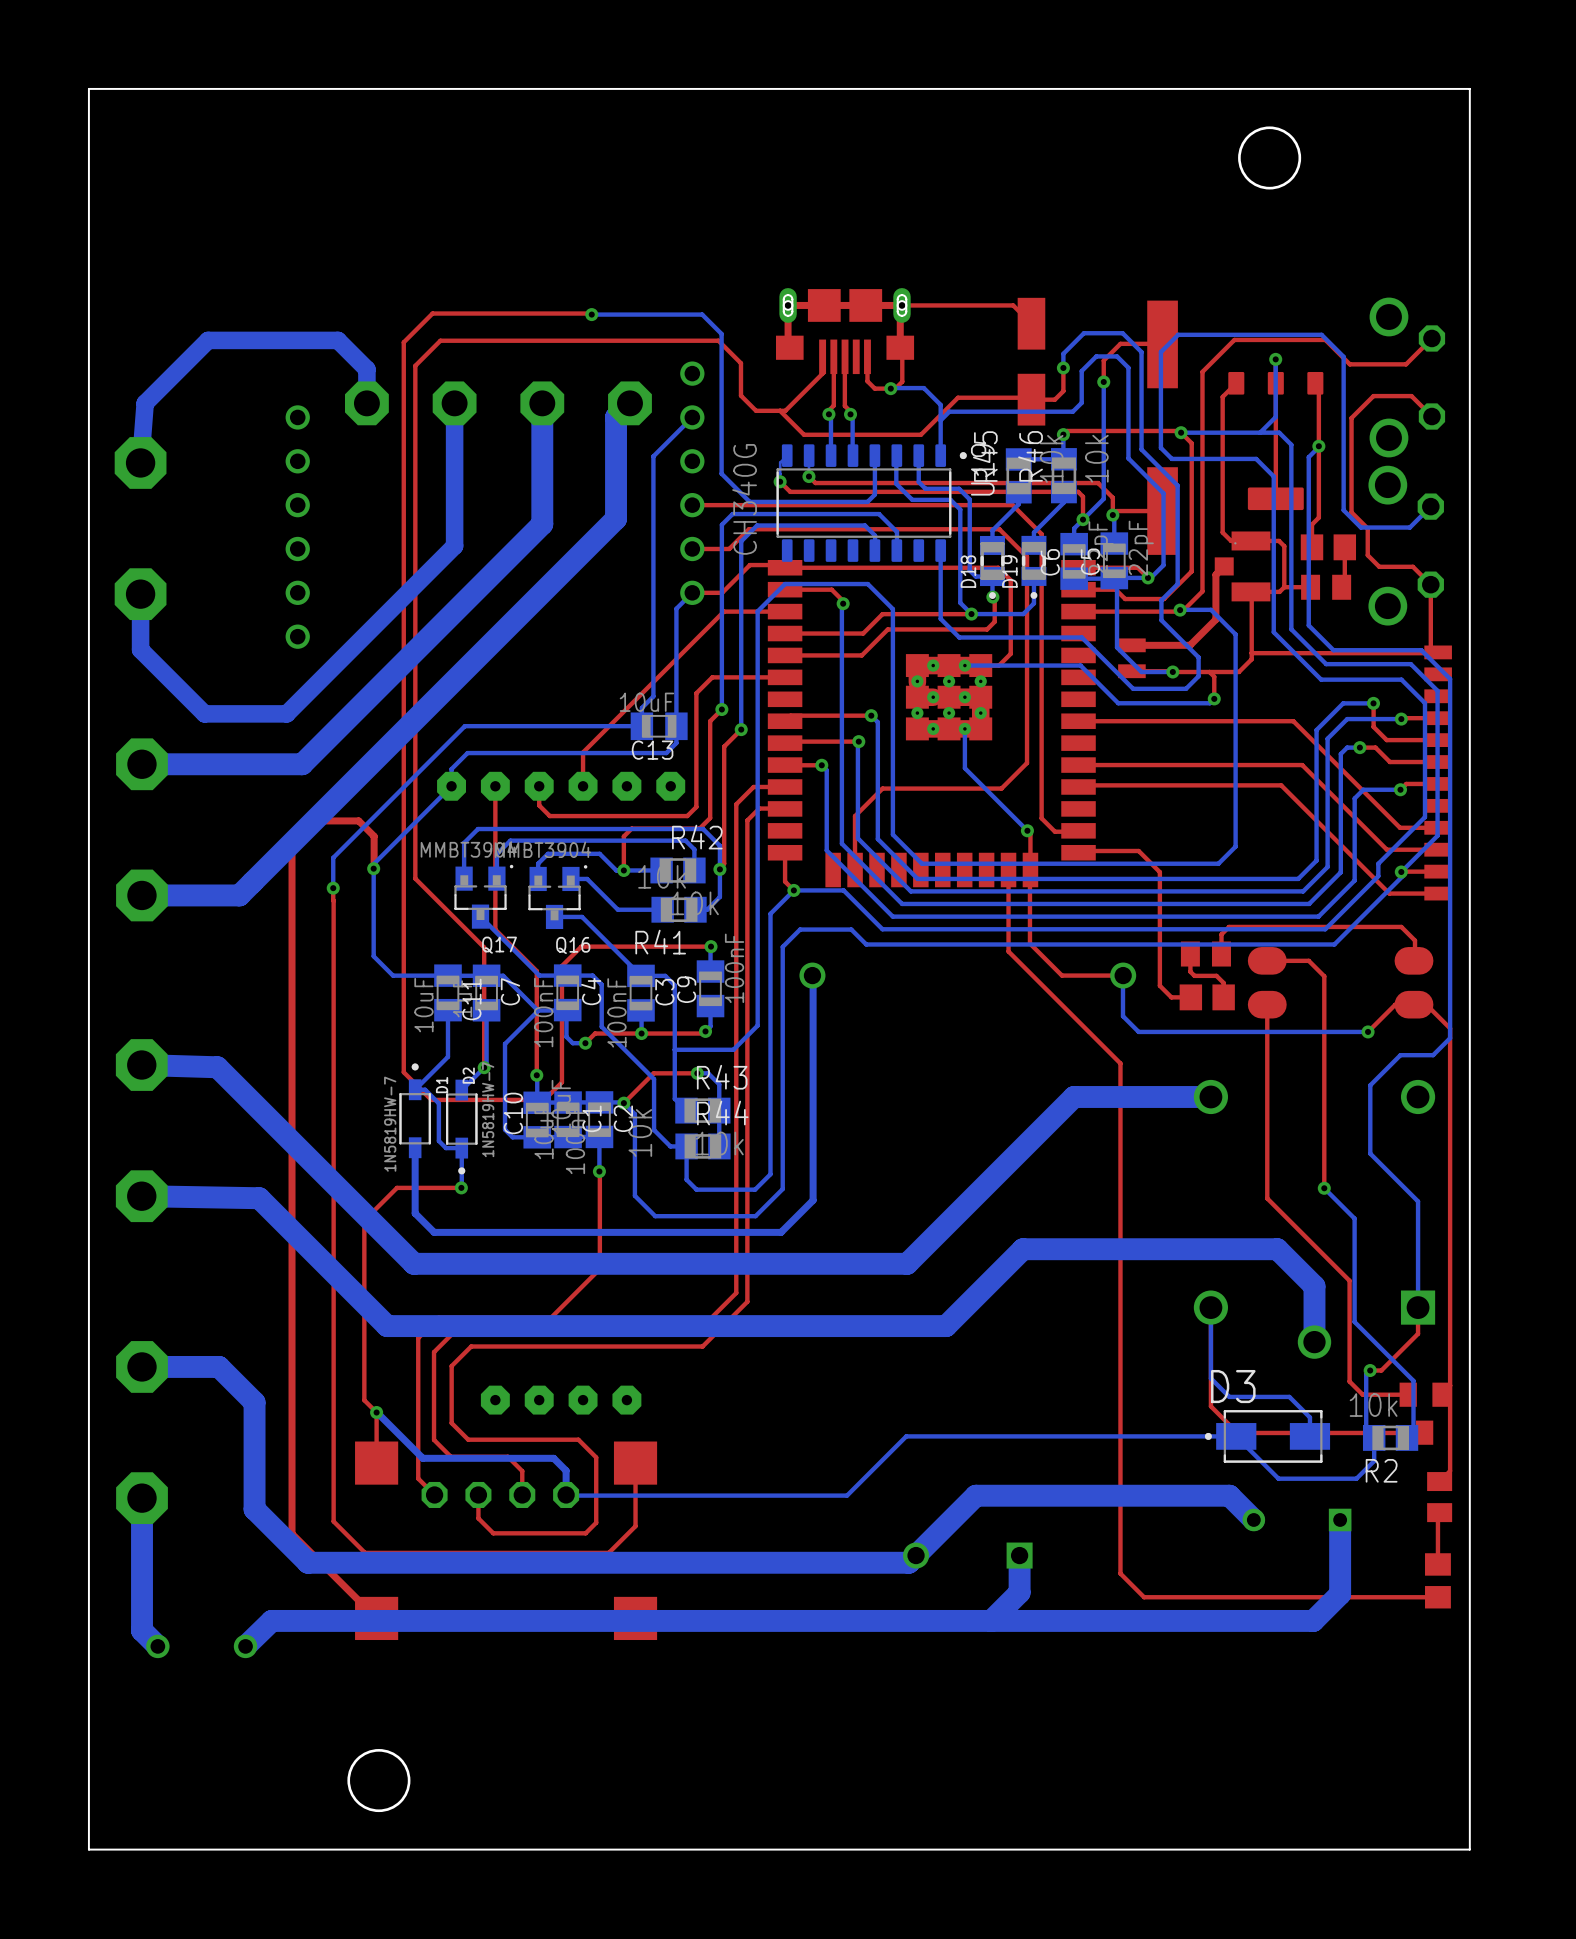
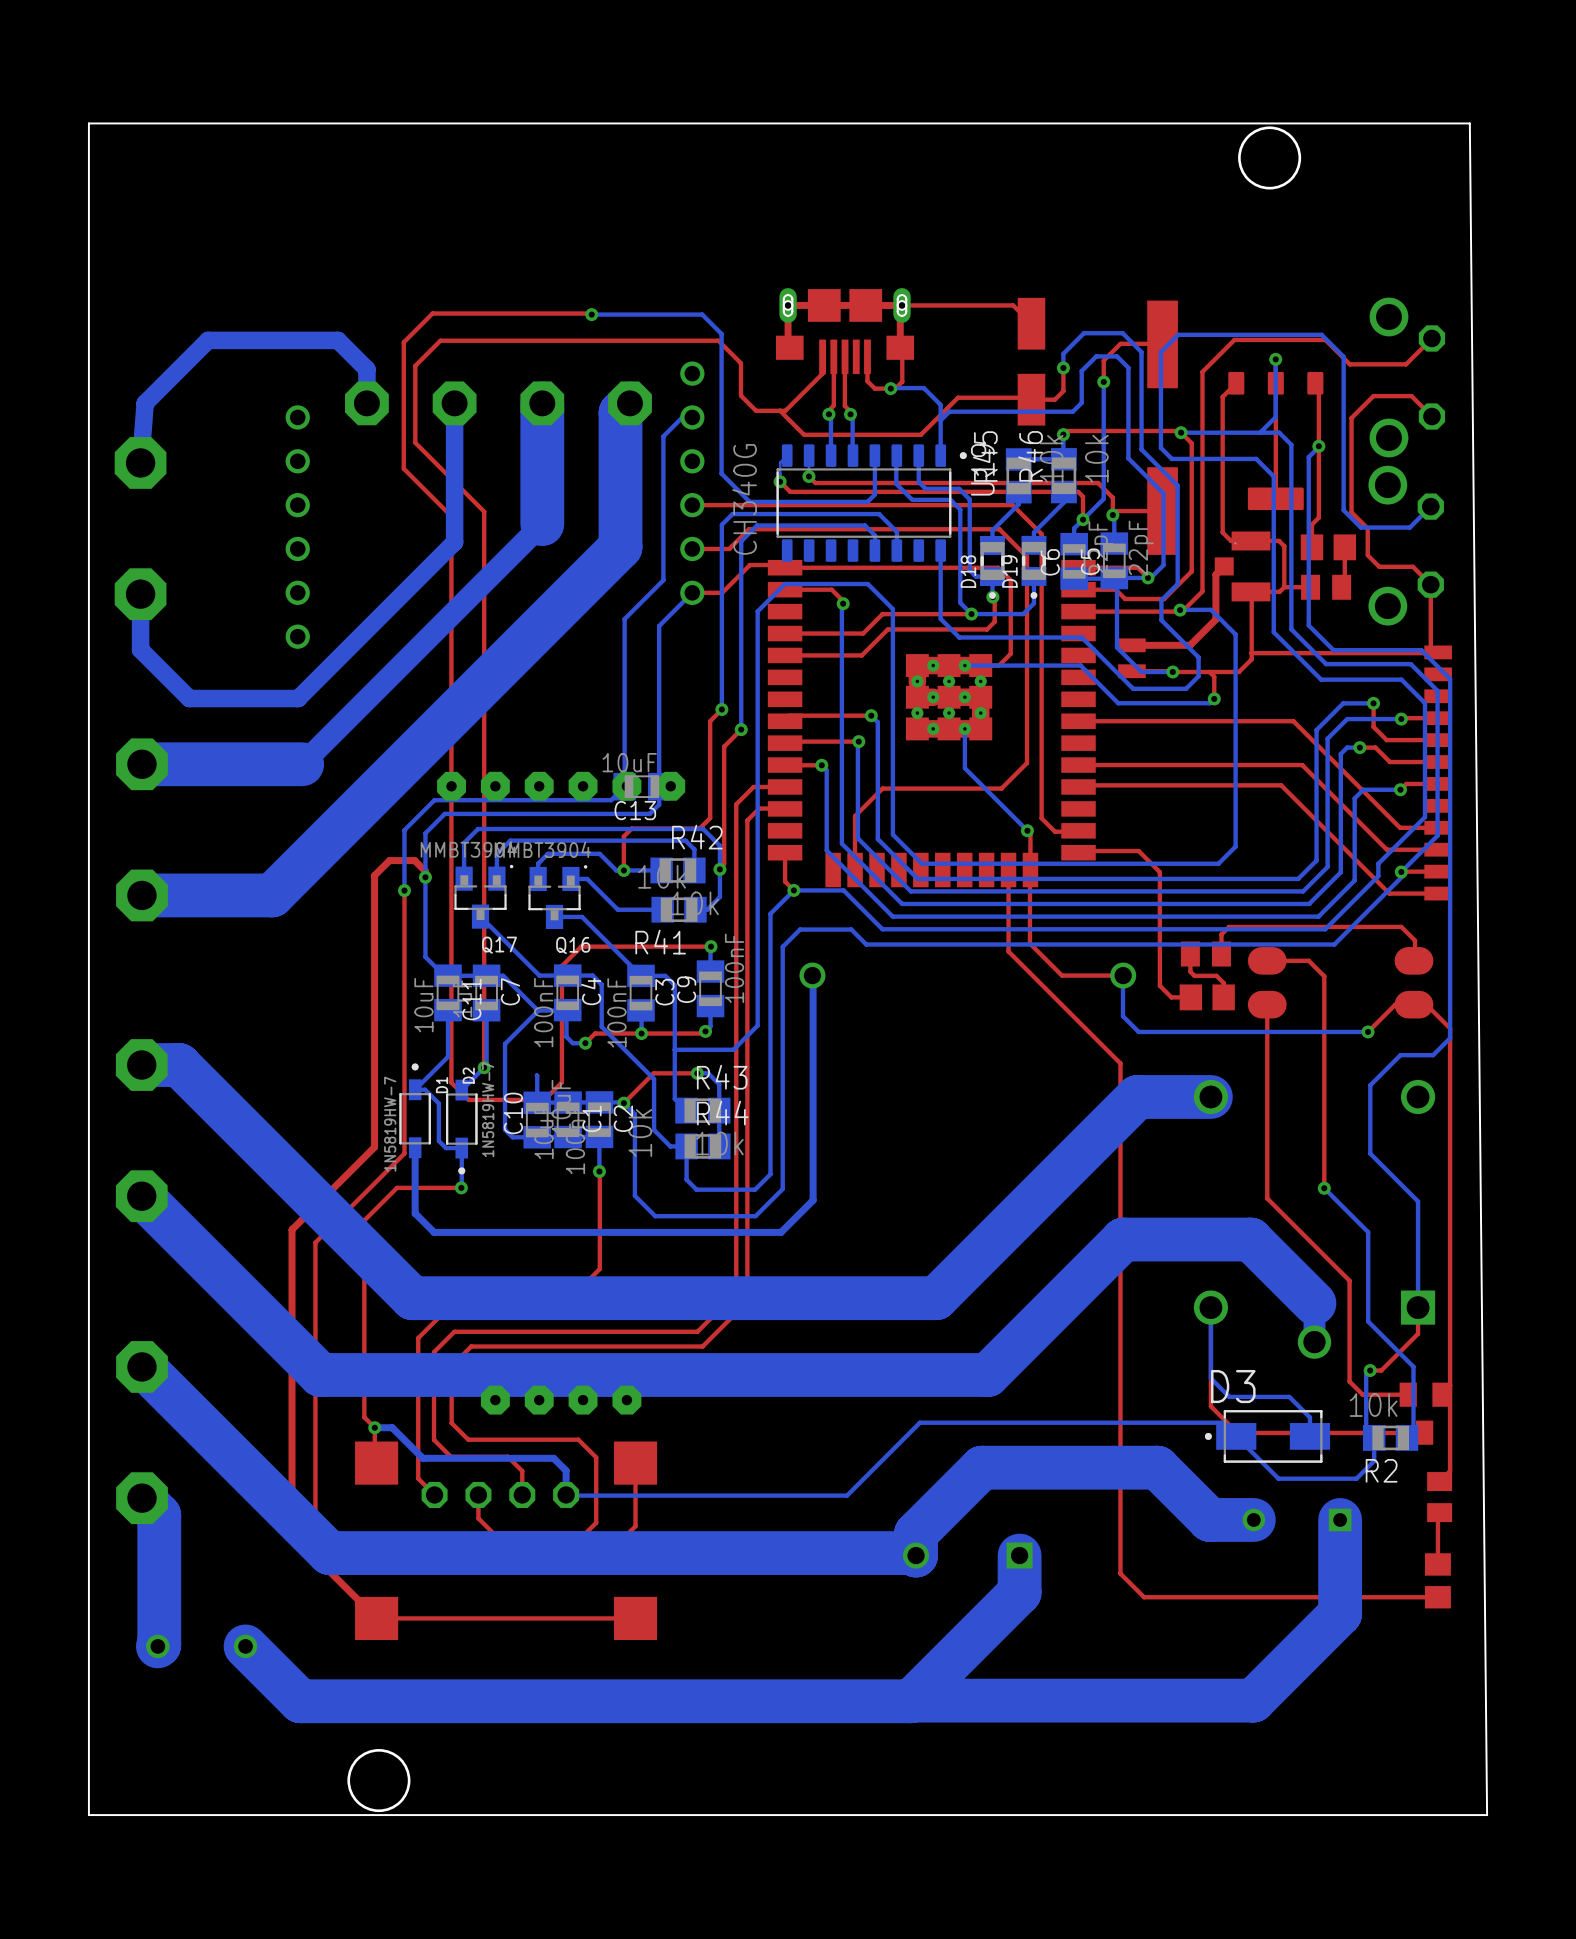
board edge: (88, 123) (88, 88) (1469, 88) (1469, 1849) (88, 1849) (88, 1815) -> (88, 123) (1469, 123) (1487, 1815) (88, 1815)
bottom track width: thin (542, 403) (542, 524) -> thick (542, 403) (542, 524)
bottom track: (620, 412) (616, 417) (616, 518) (239, 895) -> (620, 412) (620, 547) (272, 895) (239, 895)
bottom track: (692, 417) (653, 456) (653, 696) (641, 707) (641, 726) -> (692, 417) (682, 417) (663, 436) (663, 580) (624, 619) (624, 786) (611, 800) (434, 800) (404, 830) (404, 890)
top track: (415, 442) (415, 878) (484, 947) -> (415, 442) (484, 511) (484, 947)
top track: (403, 468) (403, 1072) (431, 1099) (468, 1099) -> (403, 468) (451, 516) (451, 1082) (468, 1099)
bottom track: (454, 542) (454, 546) (286, 713) (204, 713) (189, 698) -> (454, 542) (298, 698) (189, 698)
bottom track: (676, 608) (676, 743) (666, 753) (467, 753) (451, 769) (451, 786) (373, 864) (373, 956) (393, 975) (444, 975) -> (676, 608) (659, 626) (659, 804) (649, 813) (444, 813) (425, 833) (425, 957) (444, 975)
top track: (785, 611) (723, 611) (583, 752) (583, 786) -> none
top track: (785, 677) (712, 677) (696, 693) (696, 807) (687, 816) (549, 816) (539, 805) (539, 786) -> none
bottom track: (641, 726) (464, 726) (333, 857) (333, 888) -> none
C13 position: (659, 726) -> (641, 786)
bottom track width: thin (302, 764) (141, 764) -> thick (302, 764) (141, 764)
top track: (495, 786) (495, 929) (536, 971) (536, 1075) -> none
top track: (373, 868) (374, 836) (358, 820) (320, 820) (292, 849) (292, 1229) -> (425, 877) (425, 871) (414, 860) (389, 860) (374, 875) (374, 1147) (292, 1229)
via: (373, 868) -> none
via: none -> (425, 877)
top track: (333, 888) (333, 1521) (365, 1552) -> (404, 890) (404, 1153) (315, 1242) (315, 1521) (346, 1552) (365, 1552)
via: (333, 888) -> none
via: none -> (404, 890)
bottom track width: thin (239, 895) (141, 895) -> thick (239, 895) (141, 895)
bottom track: (141, 1065) (217, 1067) (414, 1263) (907, 1263) (1074, 1096) (1137, 1096) -> (141, 1065) (179, 1065) (412, 1298) (936, 1298) (1137, 1096)
via: (536, 1075) -> none
bottom track width: thin (1210, 1096) (1137, 1096) -> thick (1210, 1096) (1137, 1096)
bottom track: (141, 1196) (259, 1198) (387, 1326) (946, 1326) (1022, 1249) (1277, 1249) (1314, 1286) (1314, 1303) -> (141, 1196) (320, 1375) (987, 1375) (1123, 1239) (1250, 1239) (1314, 1303)
bottom track: (1354, 1218) (1354, 1321) (1413, 1380) -> (1354, 1218) (1368, 1232) (1368, 1321) (1413, 1366) (1413, 1380)
bottom track: (143, 1366) (219, 1366) (254, 1402) (254, 1509) (308, 1562) (908, 1562) (975, 1495) (1229, 1495) (1253, 1519) -> (143, 1366) (329, 1553) (913, 1553) (916, 1555) (916, 1533) (981, 1467) (1157, 1467) (1209, 1519) (1253, 1519)
top track: (364, 1400) (376, 1412) (376, 1463) -> (364, 1400) (364, 1417) (374, 1427) (374, 1461) (376, 1463)
bottom track: (376, 1412) (392, 1427) -> (374, 1427) (392, 1427)
via position: (376, 1412) -> (374, 1427)
bottom track: (1236, 1436) (906, 1436) -> (1236, 1436) (1222, 1422) (919, 1422) (906, 1436)
bottom track: (142, 1498) (142, 1630) (157, 1646) -> (142, 1498) (159, 1515) (157, 1646)
bottom track width: thin (1340, 1519) (1340, 1594) -> thick (1340, 1519) (1340, 1594)
bottom track width: thin (1019, 1555) (1019, 1592) (991, 1620) -> thick (1019, 1555) (1019, 1592) (991, 1620)
bottom track: (1340, 1594) (1313, 1620) (271, 1620) (245, 1646) -> (991, 1620) (910, 1701) (300, 1701) (245, 1646)
bottom track: none -> (1340, 1594) (1340, 1613) (1253, 1700) (911, 1700)

